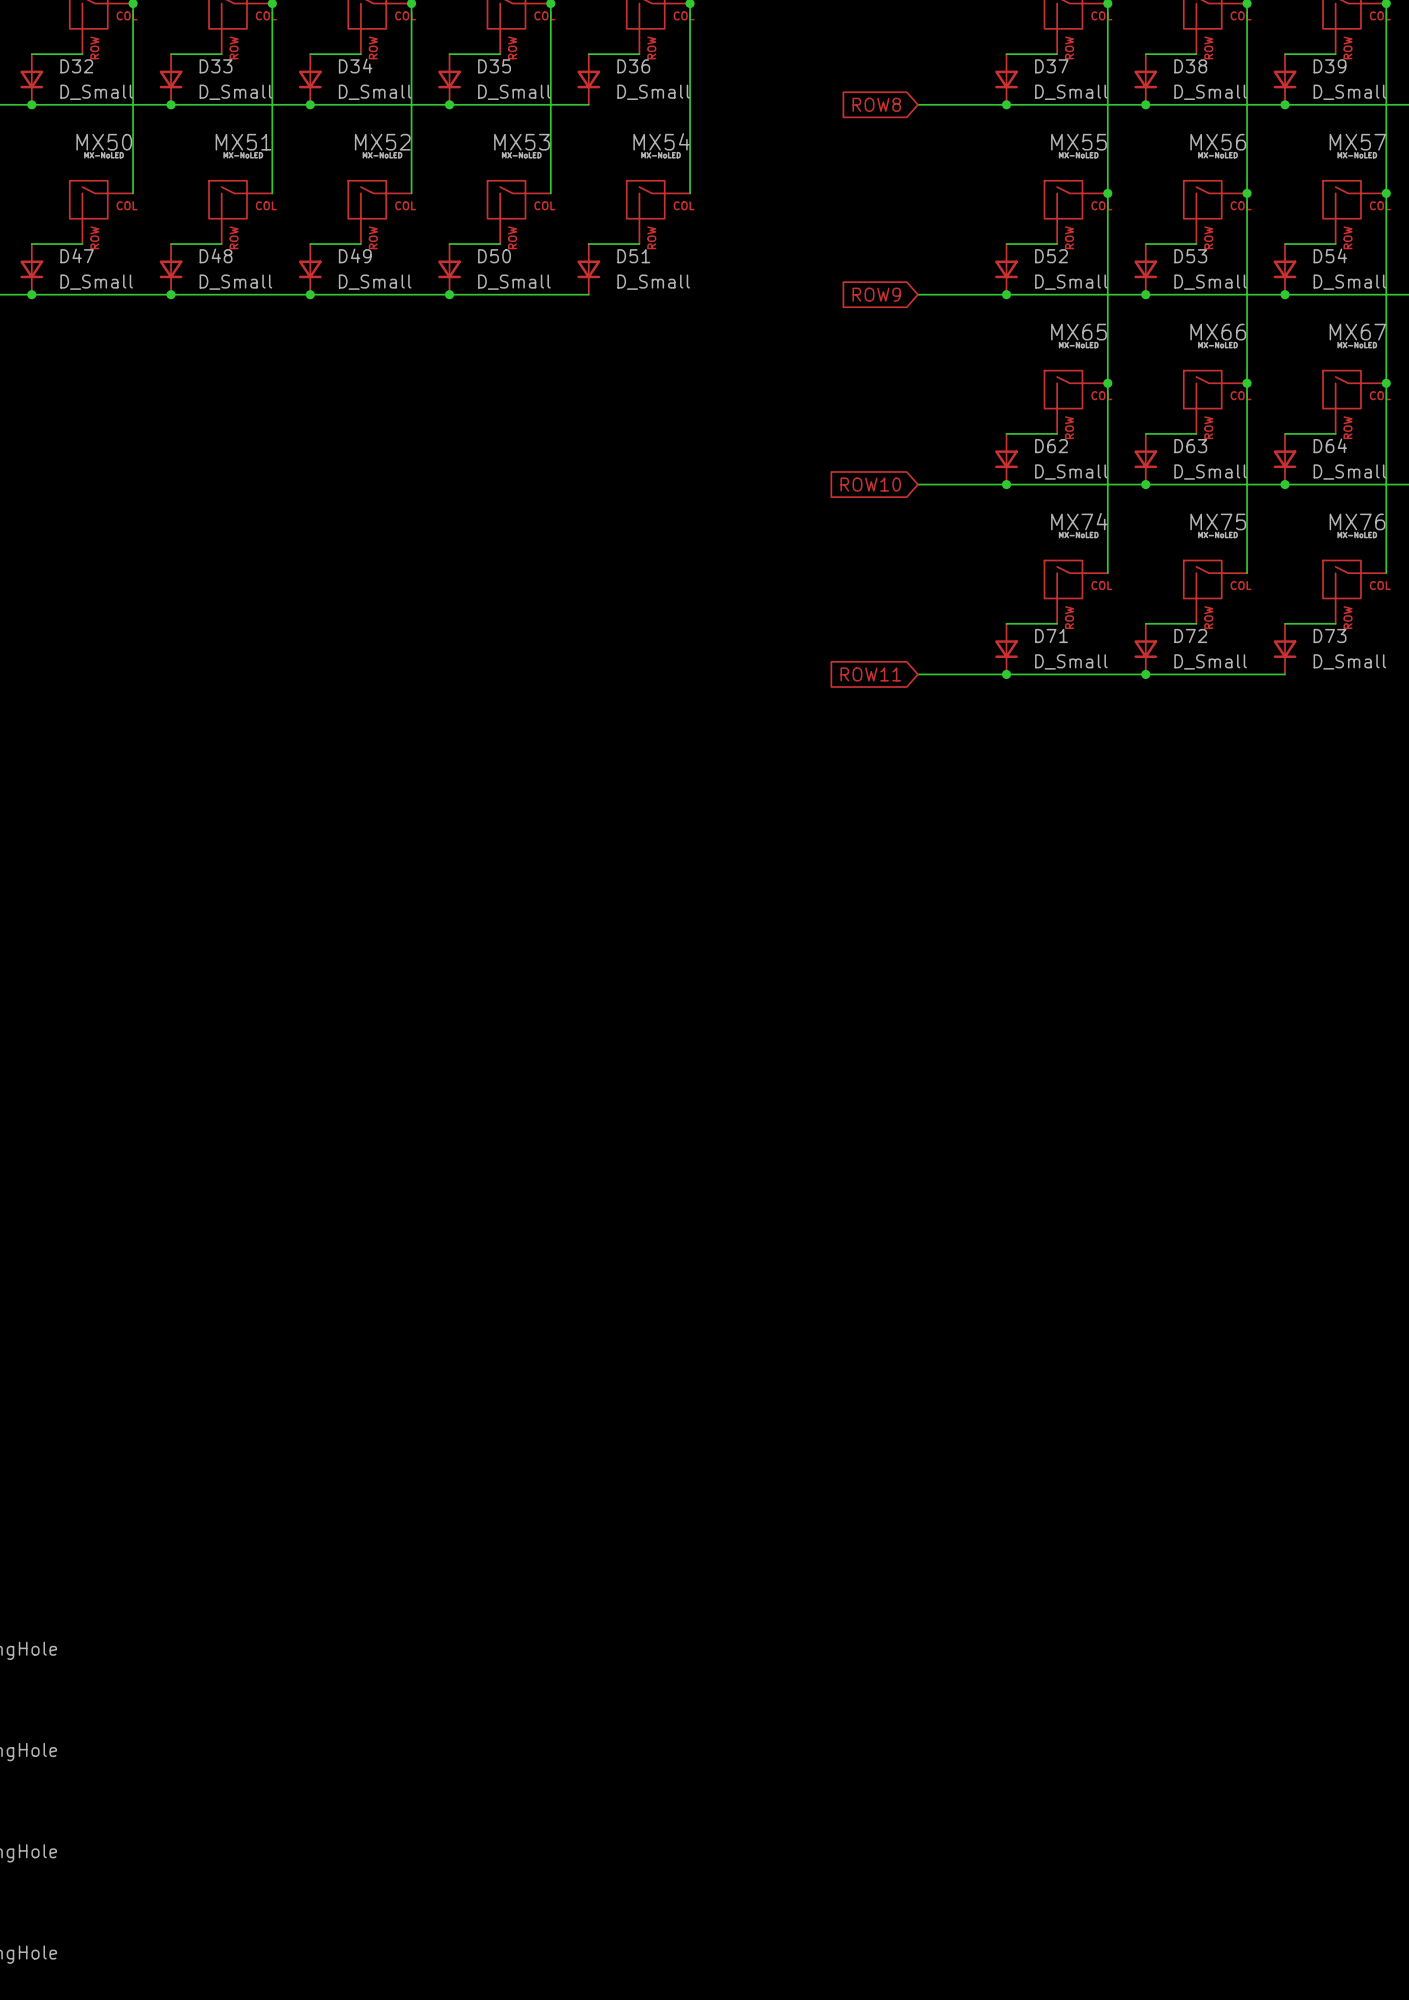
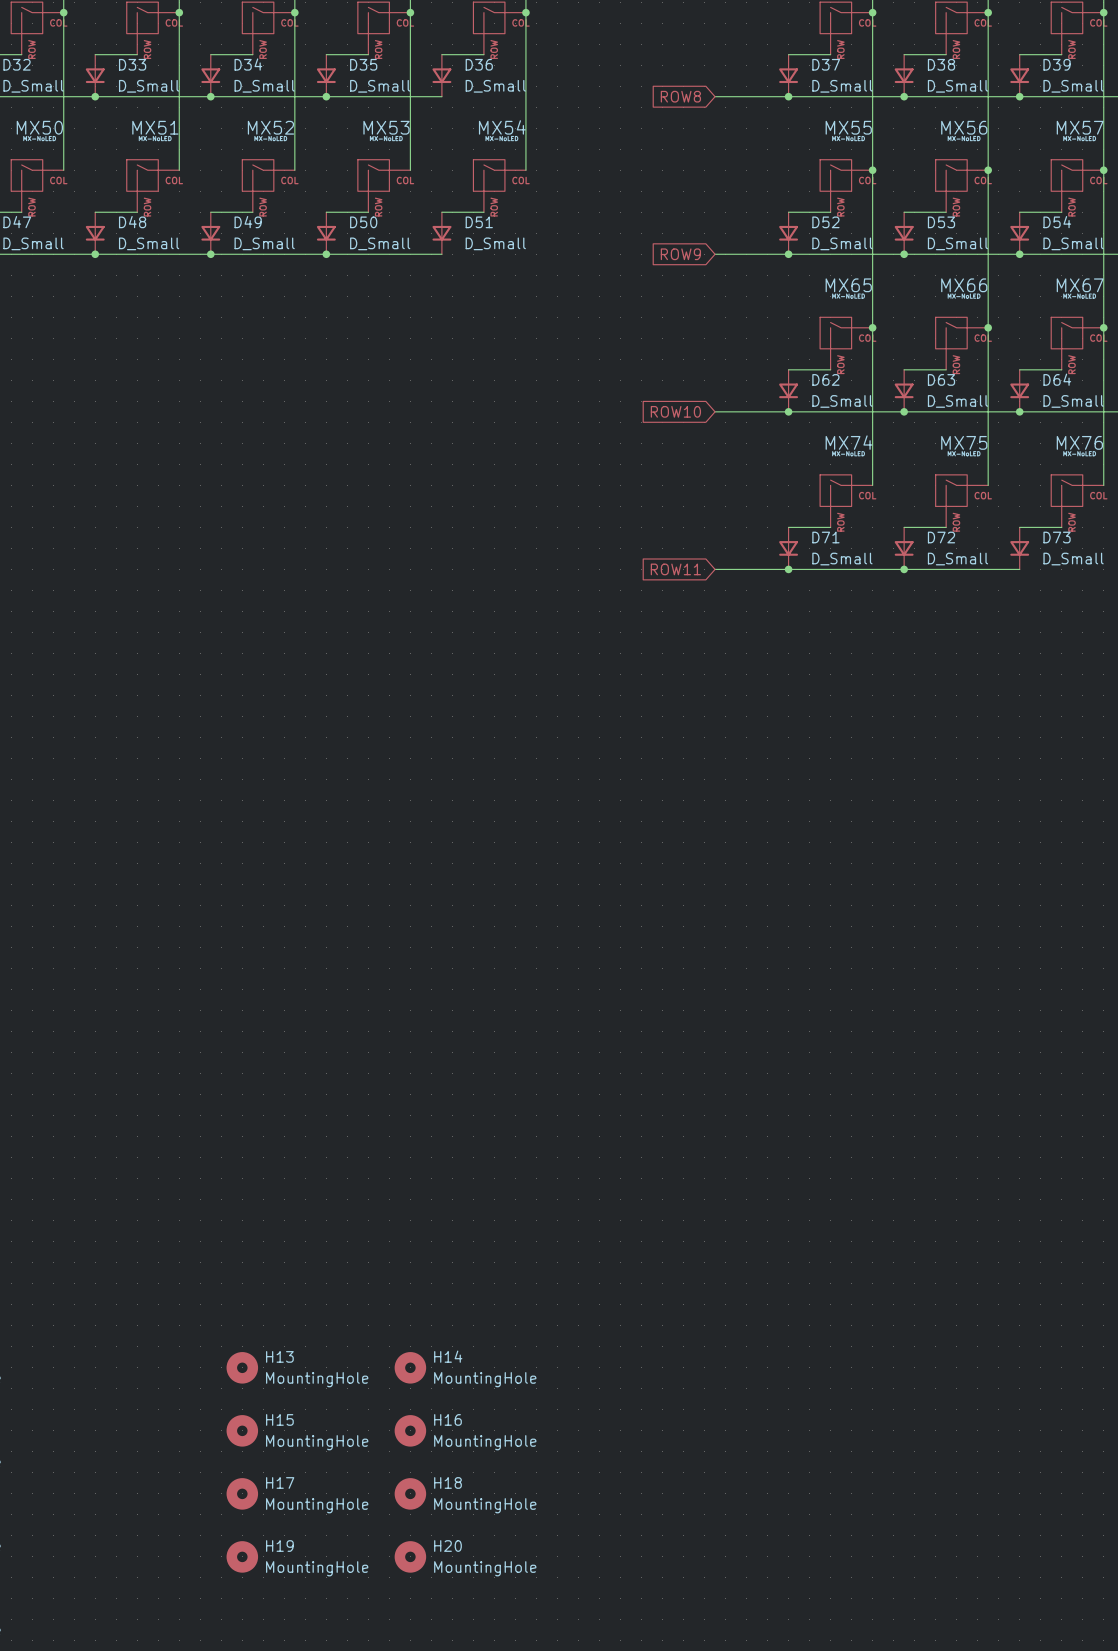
H13: none -> MountingHole (242, 1367)
H14: none -> MountingHole (410, 1367)
H15: none -> MountingHole (242, 1430)
H16: none -> MountingHole (410, 1430)
H17: none -> MountingHole (242, 1493)
H18: none -> MountingHole (410, 1493)
H19: none -> MountingHole (242, 1556)
H20: none -> MountingHole (410, 1556)

